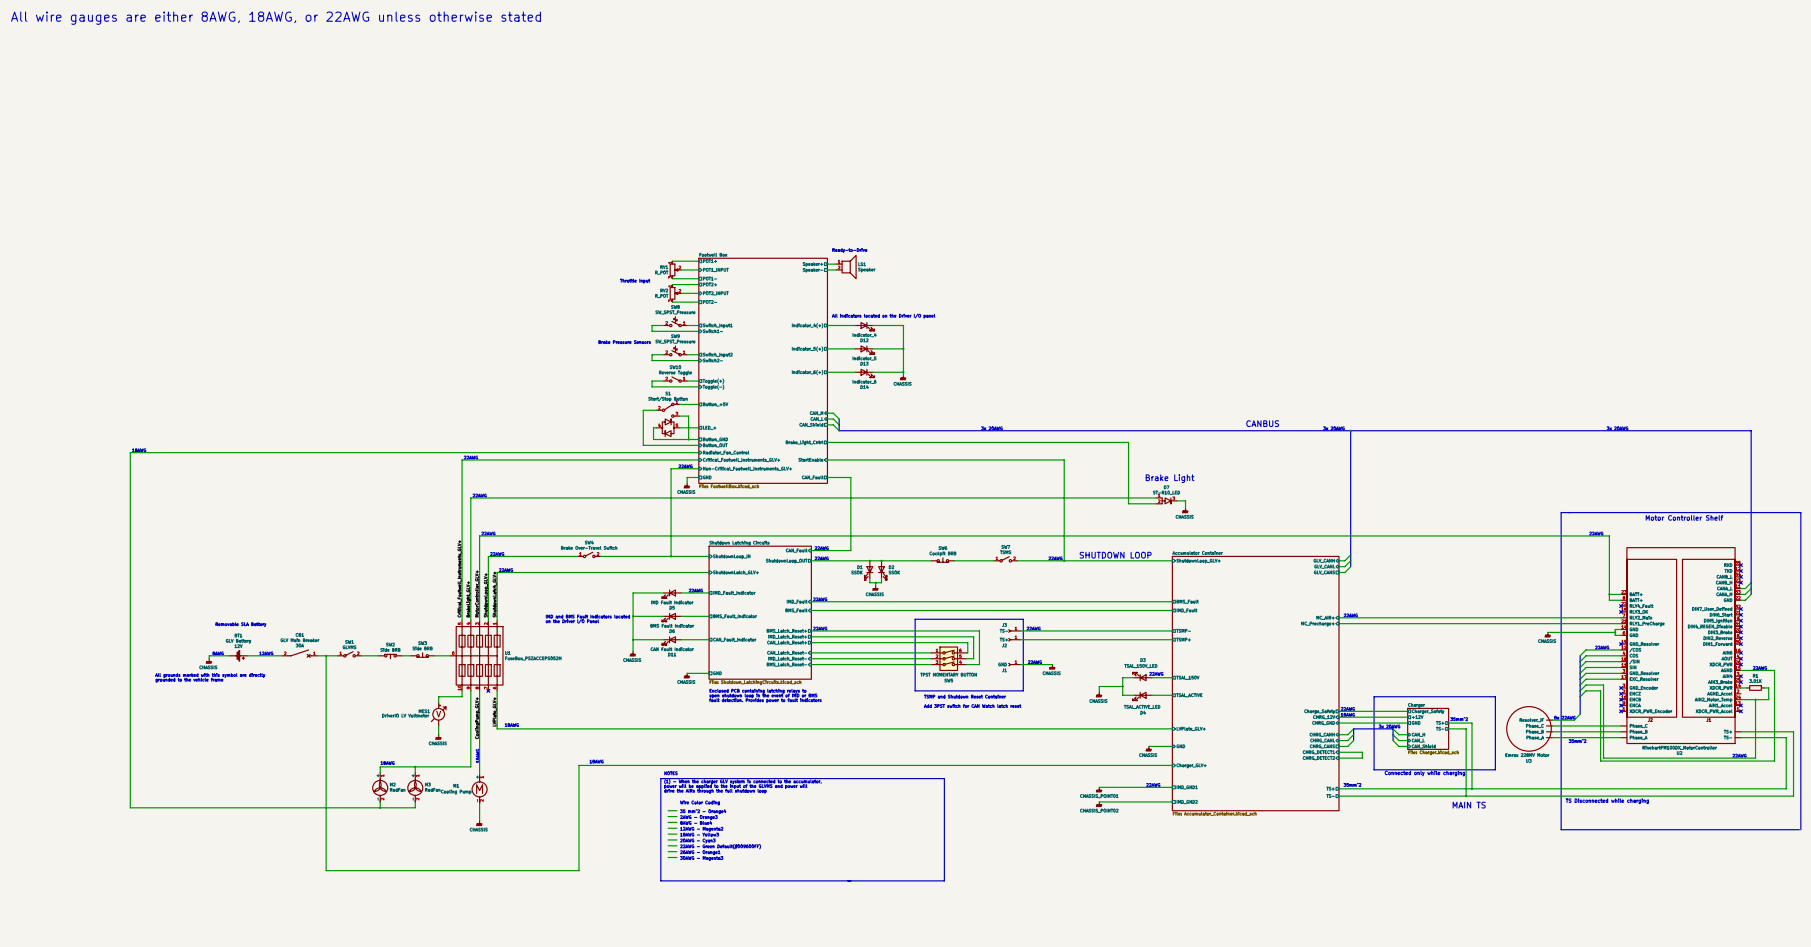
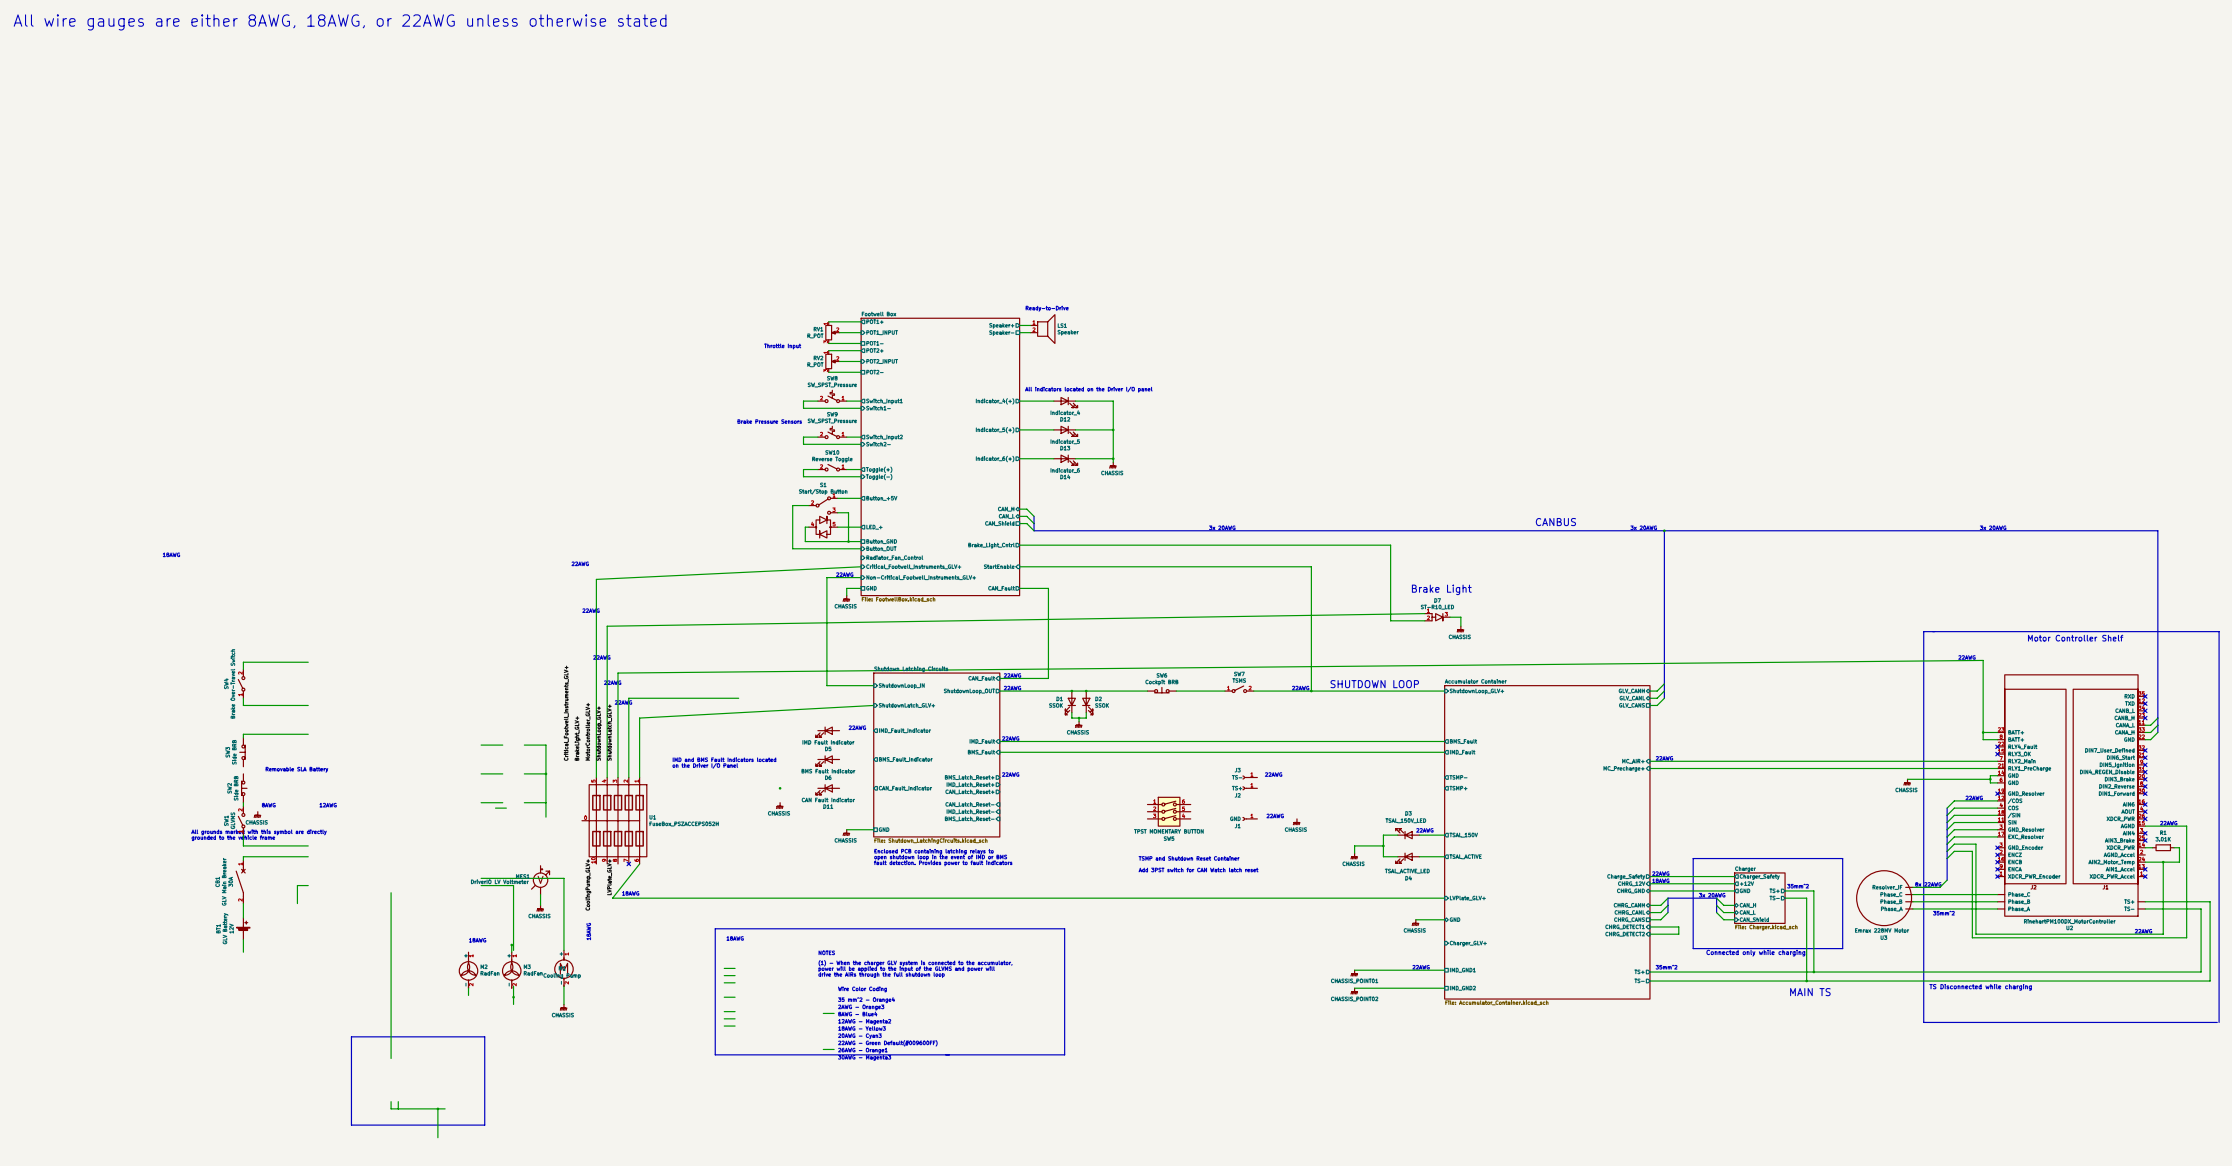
wire: (698, 452) (130, 452) (130, 807) (415, 807) (415, 801) -> none
wire: (698, 459) (462, 459) (462, 620) -> (861, 566) (596, 579) (596, 777)
wire: (1156, 497) (470, 497) (470, 620) -> (1424, 613) (607, 626) (607, 777)
wire: (1609, 535) (479, 535) (479, 620) -> (1983, 660) (618, 673) (618, 777)
wire: none -> (308, 662) (243, 662) (243, 669)
part rotation: 0° (589, 554) -> 90° counterclockwise (241, 683)
part position: (589, 554) -> (241, 683)
wire: (577, 556) (488, 556) (488, 620) -> (738, 698) (628, 698) (628, 777)
wire: (600, 556) (671, 556) -> none
wire: none -> (243, 698) (243, 705) (308, 705)
wire: (709, 572) (497, 572) (497, 620) -> (873, 705) (639, 718) (639, 777)
wire: (663, 592) (633, 592) (633, 651) -> none
wire: (681, 592) (709, 592) -> none
wire: none -> (308, 734) (243, 734) (243, 737)
wire: none -> (481, 745) (502, 745)
wire: none -> (524, 745) (545, 745) (545, 817)
wire: (633, 616) (663, 616) -> none
wire: (681, 616) (709, 616) -> none
line: (915, 619) (915, 690) (1023, 690) (1023, 619) (915, 619) -> none
wire: none -> (481, 773) (502, 773)
wire: none -> (524, 773) (545, 773)
wire: (811, 630) (979, 630) (979, 664) (966, 664) -> none
wire: (1020, 630) (1172, 630) -> none
wire: (811, 636) (973, 636) (973, 658) (966, 658) -> none
wire: (633, 639) (663, 639) -> none
wire: (681, 639) (709, 639) -> none
wire: (1020, 639) (1172, 639) -> none
wire: (811, 642) (967, 642) (966, 652) -> none
wire: none -> (243, 802) (243, 806)
wire: none -> (524, 802) (545, 802)
wire: (811, 652) (931, 652) -> none
part rotation: 0° (299, 653) -> 90° counterclockwise (240, 881)
part position: (299, 653) -> (240, 881)
part rotation: 0° (349, 654) -> 90° counterclockwise (241, 820)
part position: (349, 654) -> (241, 820)
wire: (229, 655) (209, 655) (209, 658) -> none
part position: (238, 655) -> (243, 928)
part rotation: 0° (240, 655) -> 90° counterclockwise (243, 926)
wire: (247, 655) (282, 655) -> none
wire: (317, 655) (337, 655) -> none
wire: (326, 655) (326, 870) (578, 870) (578, 765) (1172, 765) -> none
wire: (361, 655) (378, 655) -> (481, 802) (502, 802)
part rotation: 0° (422, 655) -> 90° counterclockwise (242, 752)
part position: (422, 655) -> (242, 752)
wire: (434, 655) (450, 655) -> none
part position: (476, 655) -> (614, 820)
part rotation: 0° (390, 656) -> 90° counterclockwise (244, 788)
part position: (390, 656) -> (244, 788)
wire: (811, 658) (931, 658) -> none
wire: (811, 664) (931, 664) -> none
wire: (1020, 664) (1052, 664) -> none
wire: none -> (243, 835) (243, 845) (308, 845)
wire: (462, 690) (462, 696) (438, 696) (438, 702) -> none
wire: (470, 690) (470, 766) (380, 766) (380, 772) -> none
wire: (479, 690) (479, 774) -> none
no-connect mark: (488, 690) -> none
wire: (497, 690) (497, 728) -> (639, 863) (612, 898)
wire: none -> (308, 856) (243, 856) (243, 860)
no-connect mark: none -> (628, 863)
wire: none -> (481, 878) (563, 878) (563, 950)
wire: none -> (308, 885) (297, 885) (297, 903)
wire: none -> (481, 885) (513, 885) (513, 950)
wire: none -> (391, 892) (391, 1058)
wire: none -> (243, 903) (243, 917)
line: none -> (715, 928) (1064, 928) (1064, 1054) (715, 1054) (715, 928)
wire: none -> (243, 939) (243, 952)
line: (660, 778) (944, 778) (944, 880) (660, 880) (660, 778) -> none
wire: none -> (724, 968) (735, 968)
part position: (479, 788) -> (563, 968)
wire: none -> (724, 975) (735, 975)
wire: none -> (724, 982) (735, 982)
wire: none -> (513, 986) (513, 1004)
wire: none -> (563, 986) (563, 1004)
wire: (479, 803) (479, 820) -> none
junction: none -> (513, 997)
wire: none -> (724, 997) (735, 997)
wire: (668, 810) (676, 810) -> none
wire: (668, 816) (676, 816) -> none
wire: none -> (724, 1011) (735, 1011)
part position: (479, 823) -> (563, 1007)
wire: none -> (724, 1018) (735, 1018)
wire: (668, 828) (676, 828) -> none
wire: none -> (724, 1026) (735, 1026)
wire: (668, 834) (676, 834) -> none
wire: (668, 839) (676, 839) -> none
line: none -> (351, 1036) (351, 1125) (484, 1125) (484, 1036) (351, 1036)
wire: (668, 845) (676, 845) -> none
wire: (668, 857) (676, 857) -> none
wire: none -> (391, 1101) (391, 1108) (445, 1108)
wire: none -> (398, 1101) (398, 1108)
wire: none -> (437, 1108) (437, 1137)

